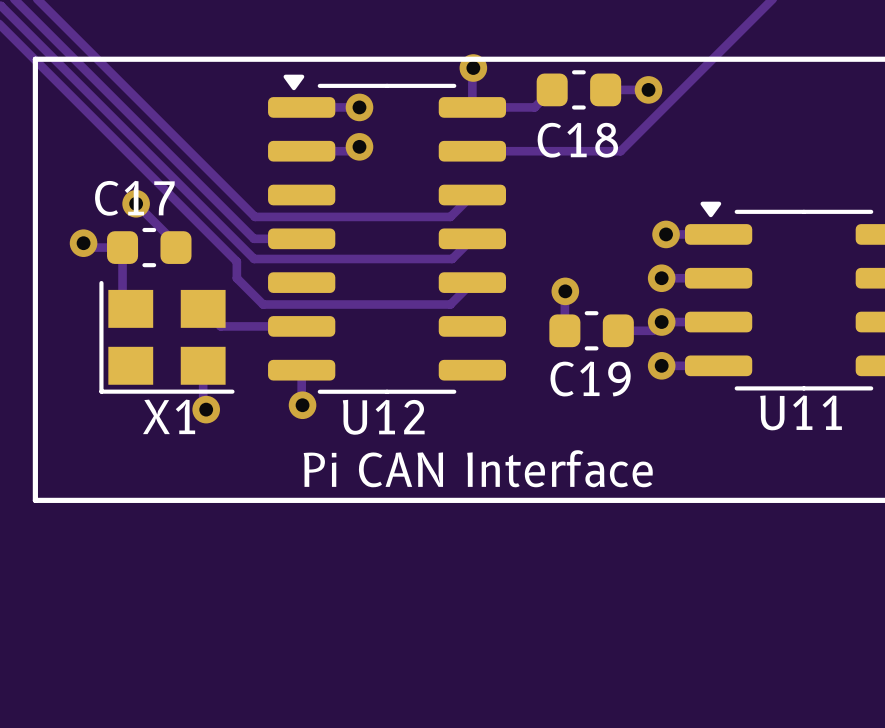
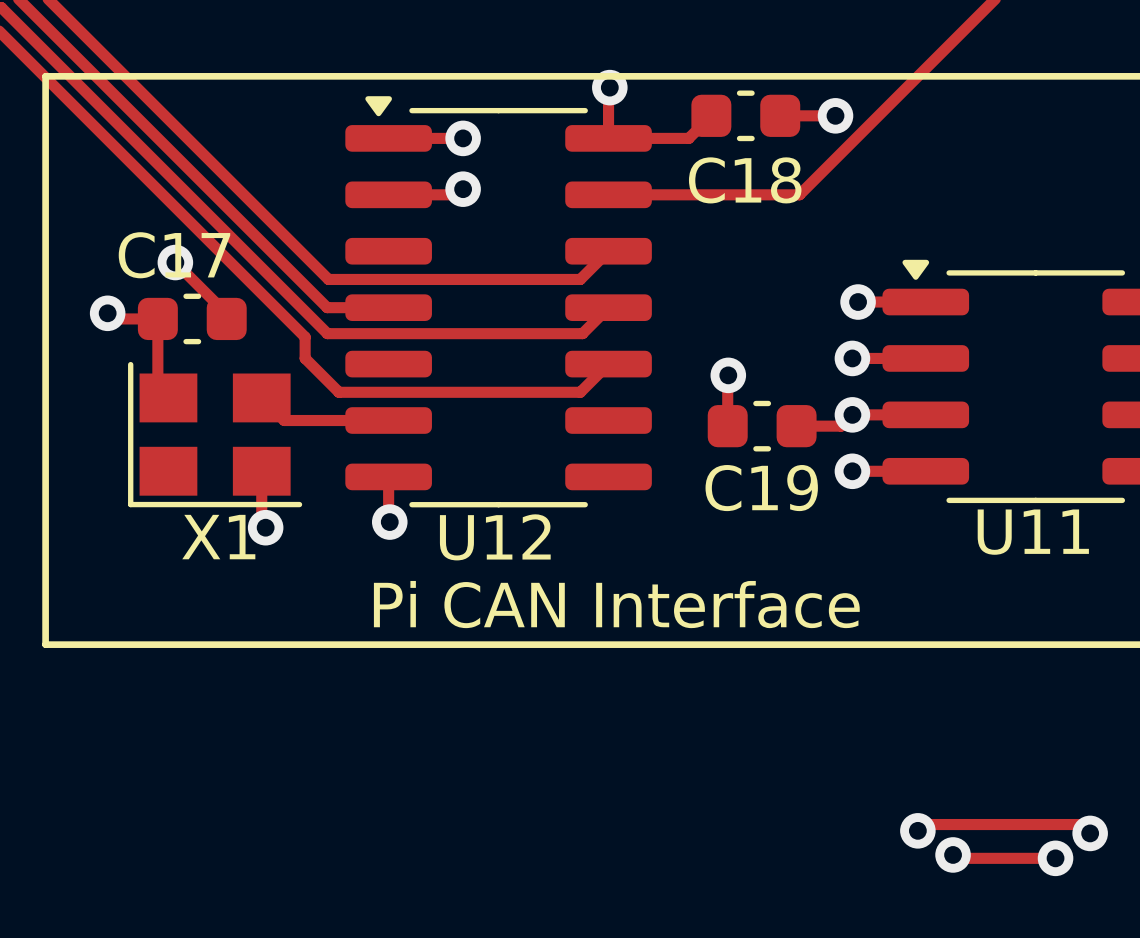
track: none -> (917, 830) (924, 824) (1081, 824) (1090, 833)
via: none -> (917, 830)
via: none -> (1090, 833)
track: none -> (953, 854) (956, 858) (1055, 858)
via: none -> (953, 854)
via: none -> (1055, 858)

